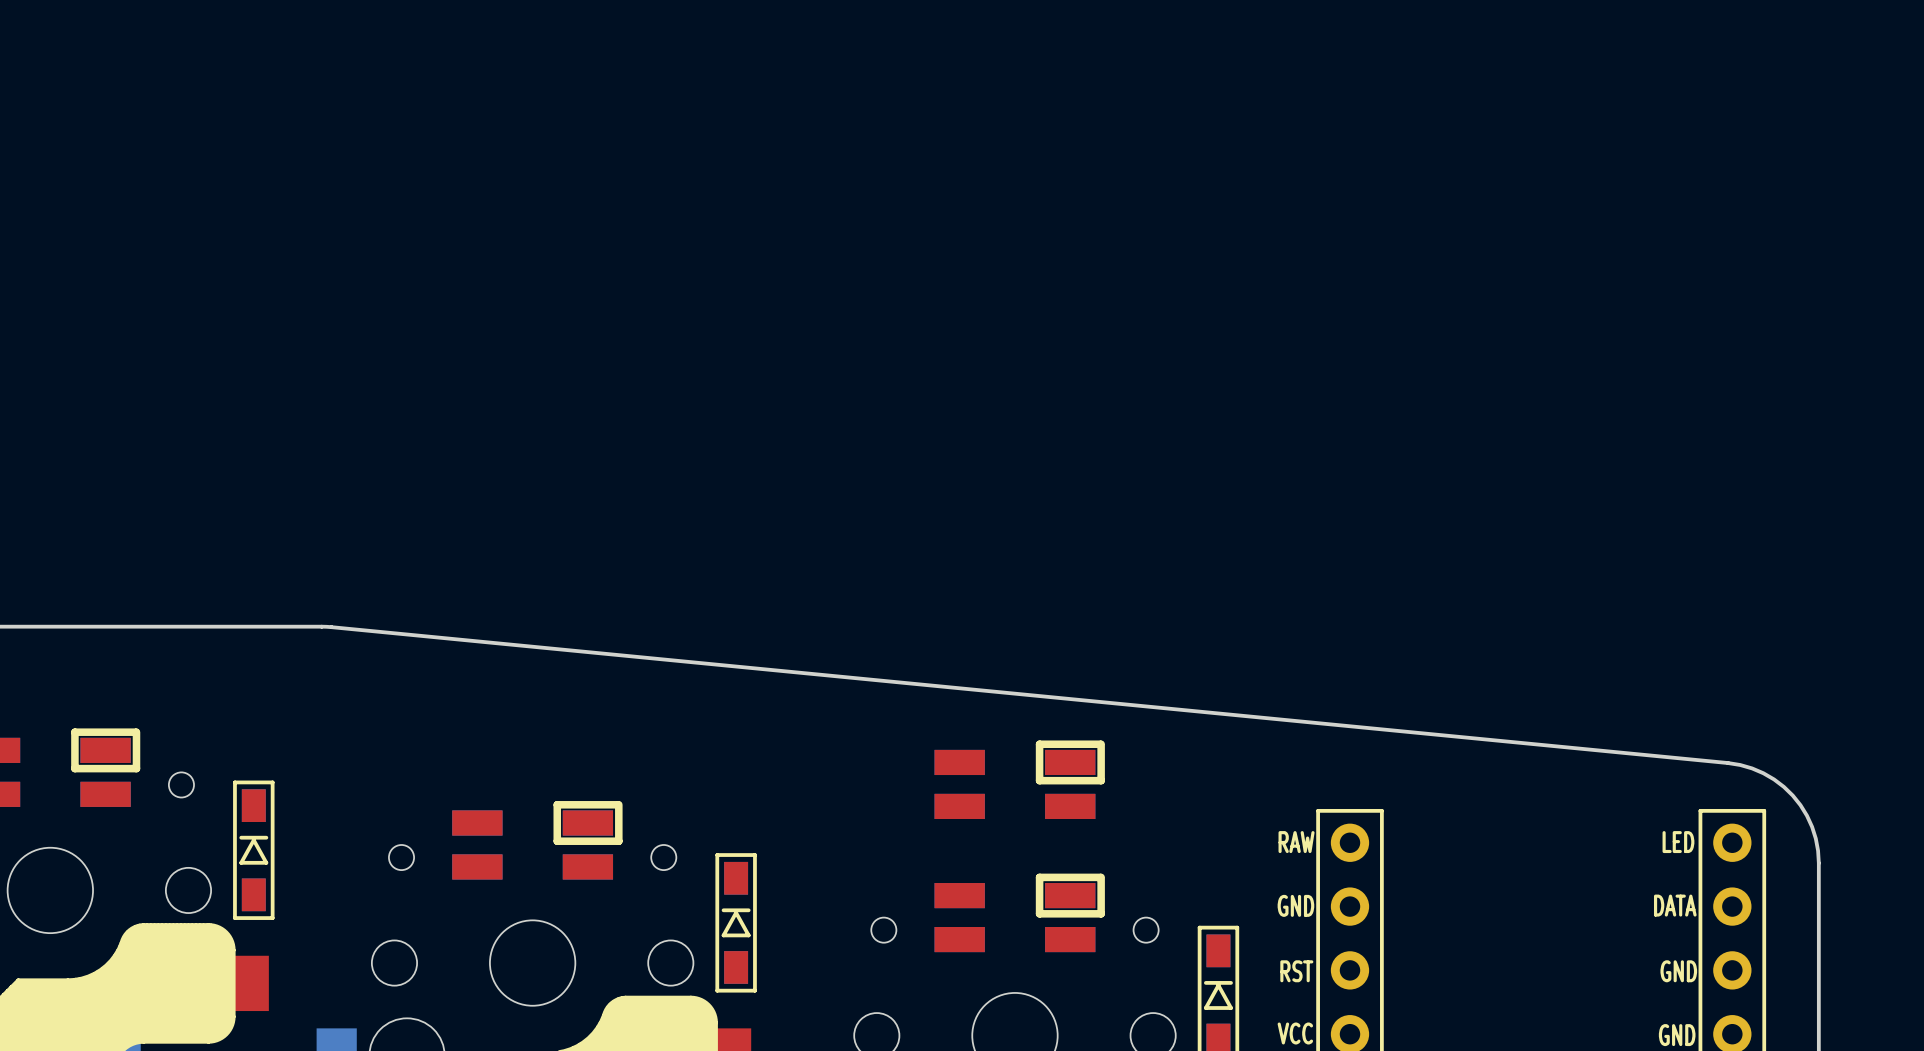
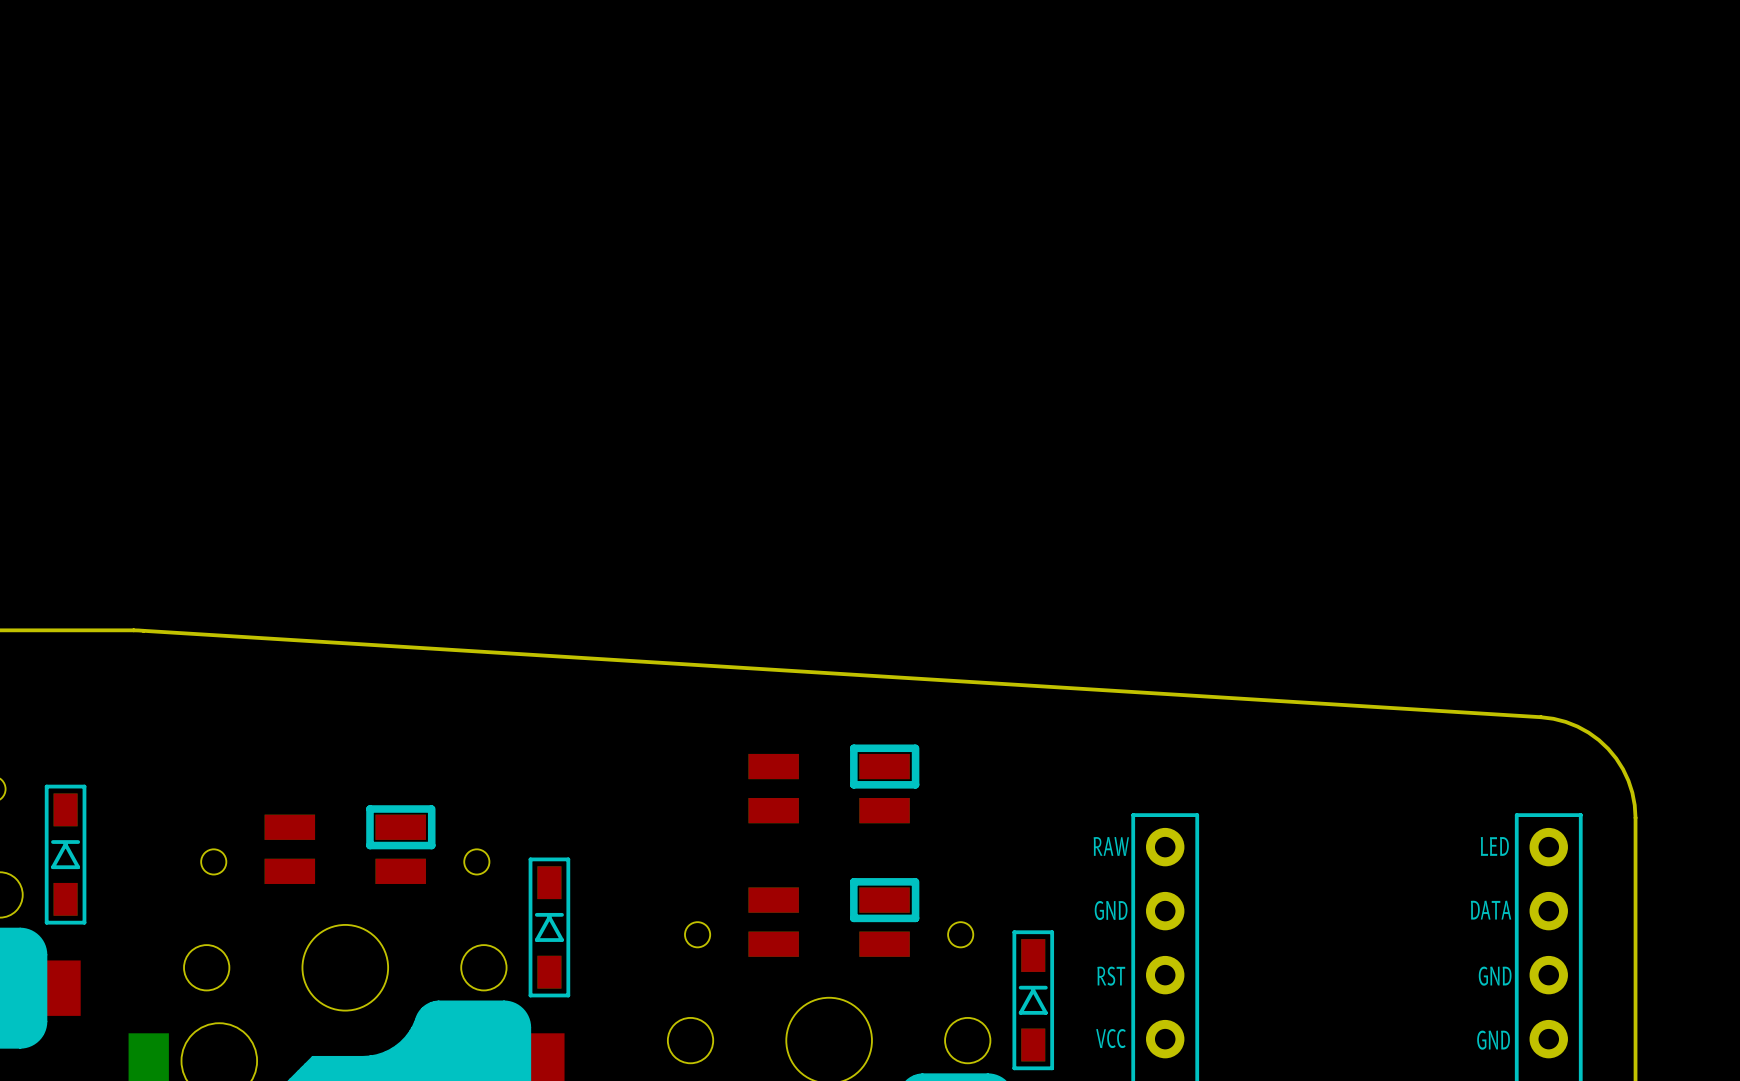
board edge: (331, 627) (1728, 763) (1740, 764) (1763, 773) (1774, 779) (1792, 795) (1806, 815) (1812, 826) (1815, 838) (1818, 863) -> (143, 630) (1553, 718) (1577, 726) (1598, 740) (1608, 748) (1623, 769) (1628, 780) (1634, 805) (1635, 867)

